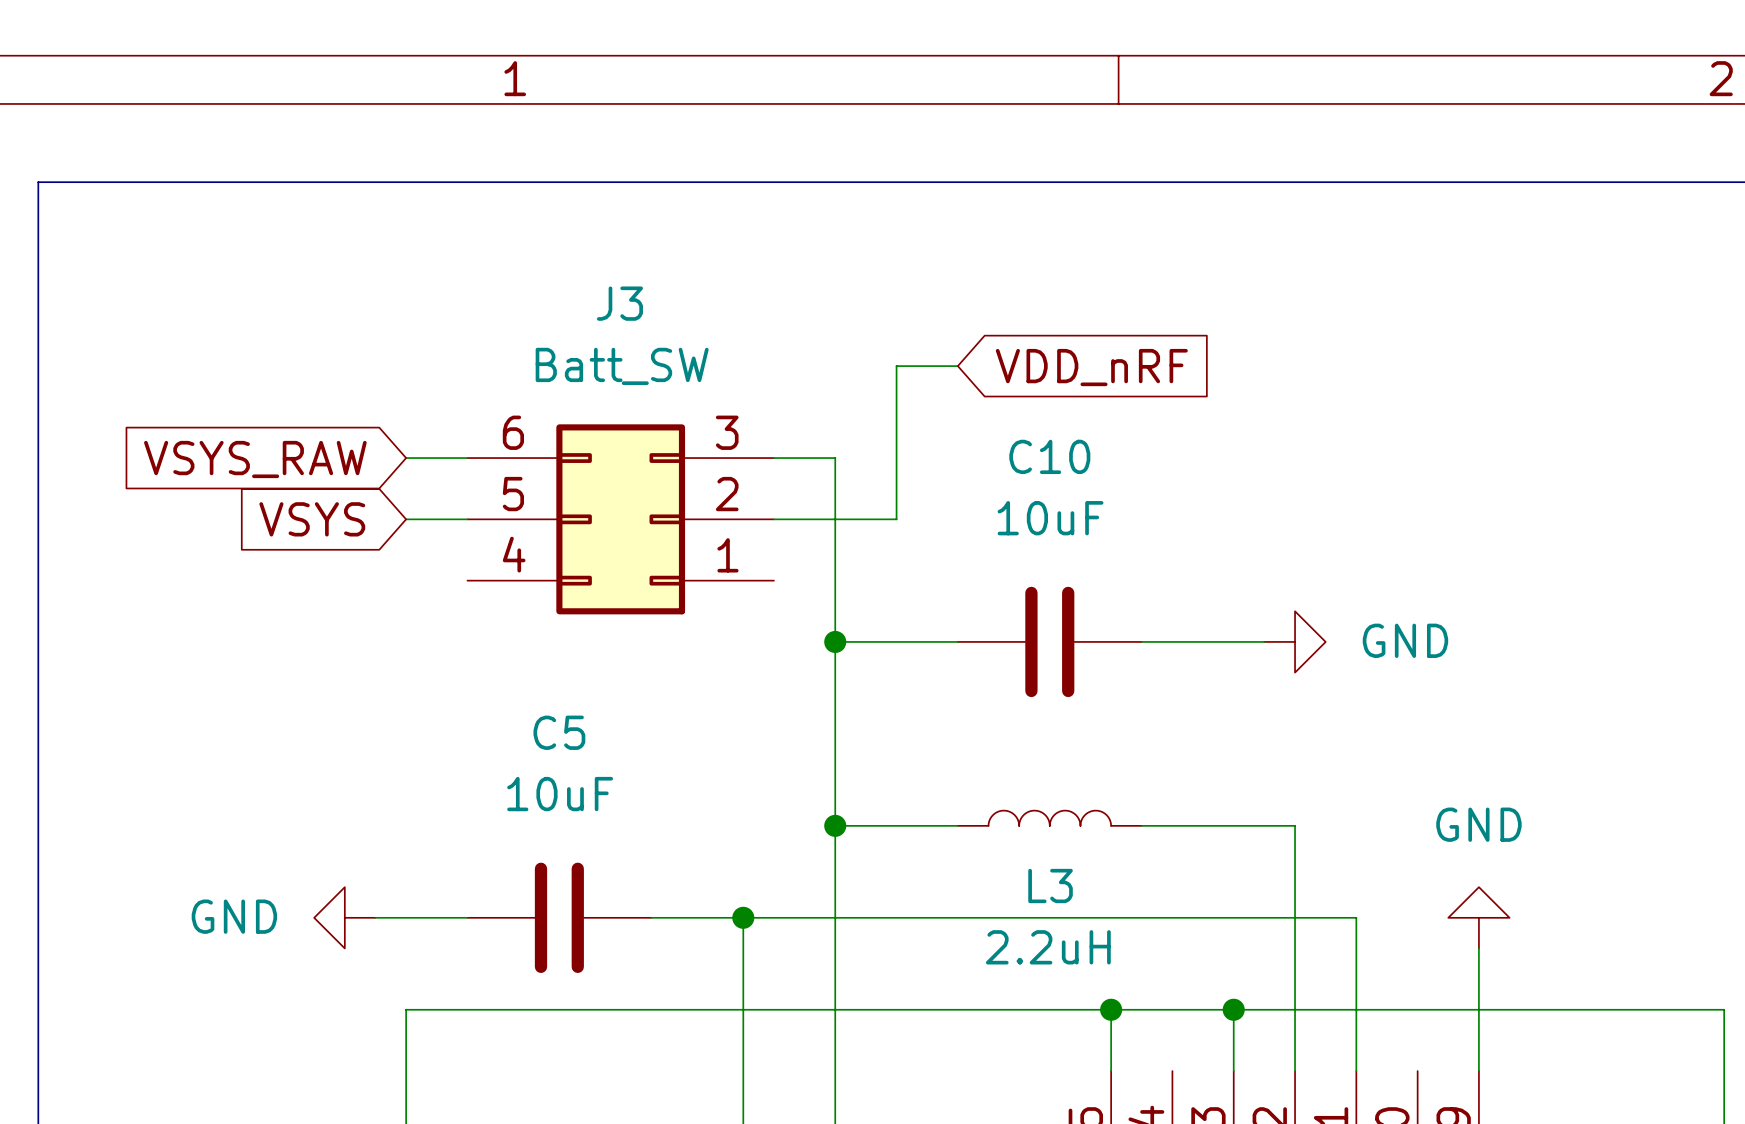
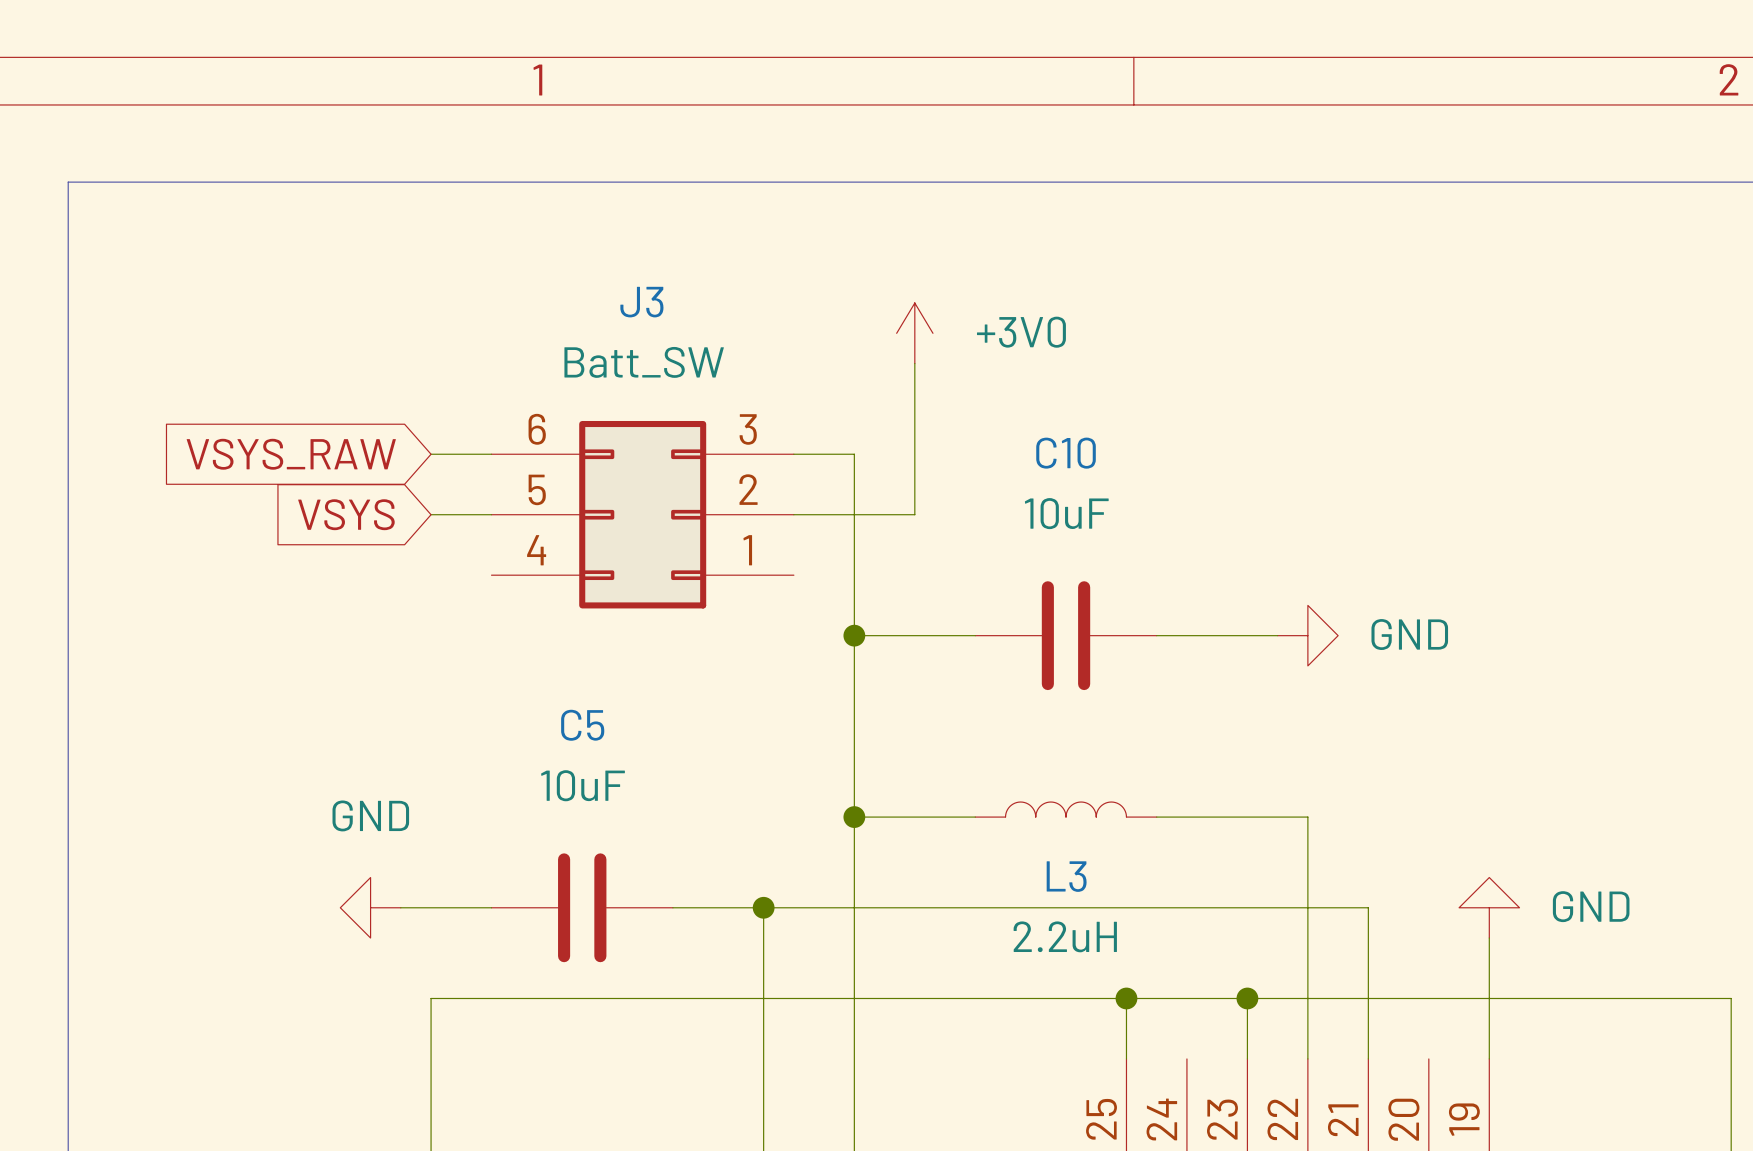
power symbol: none -> +3V0 (914, 333)
wire: (896, 366) (957, 366) -> none
global label: VDD_nRF (1091, 367) -> none
power symbol text position: GND (1478, 824) -> GND (1591, 906)
power symbol text position: GND (234, 916) -> GND (370, 815)

